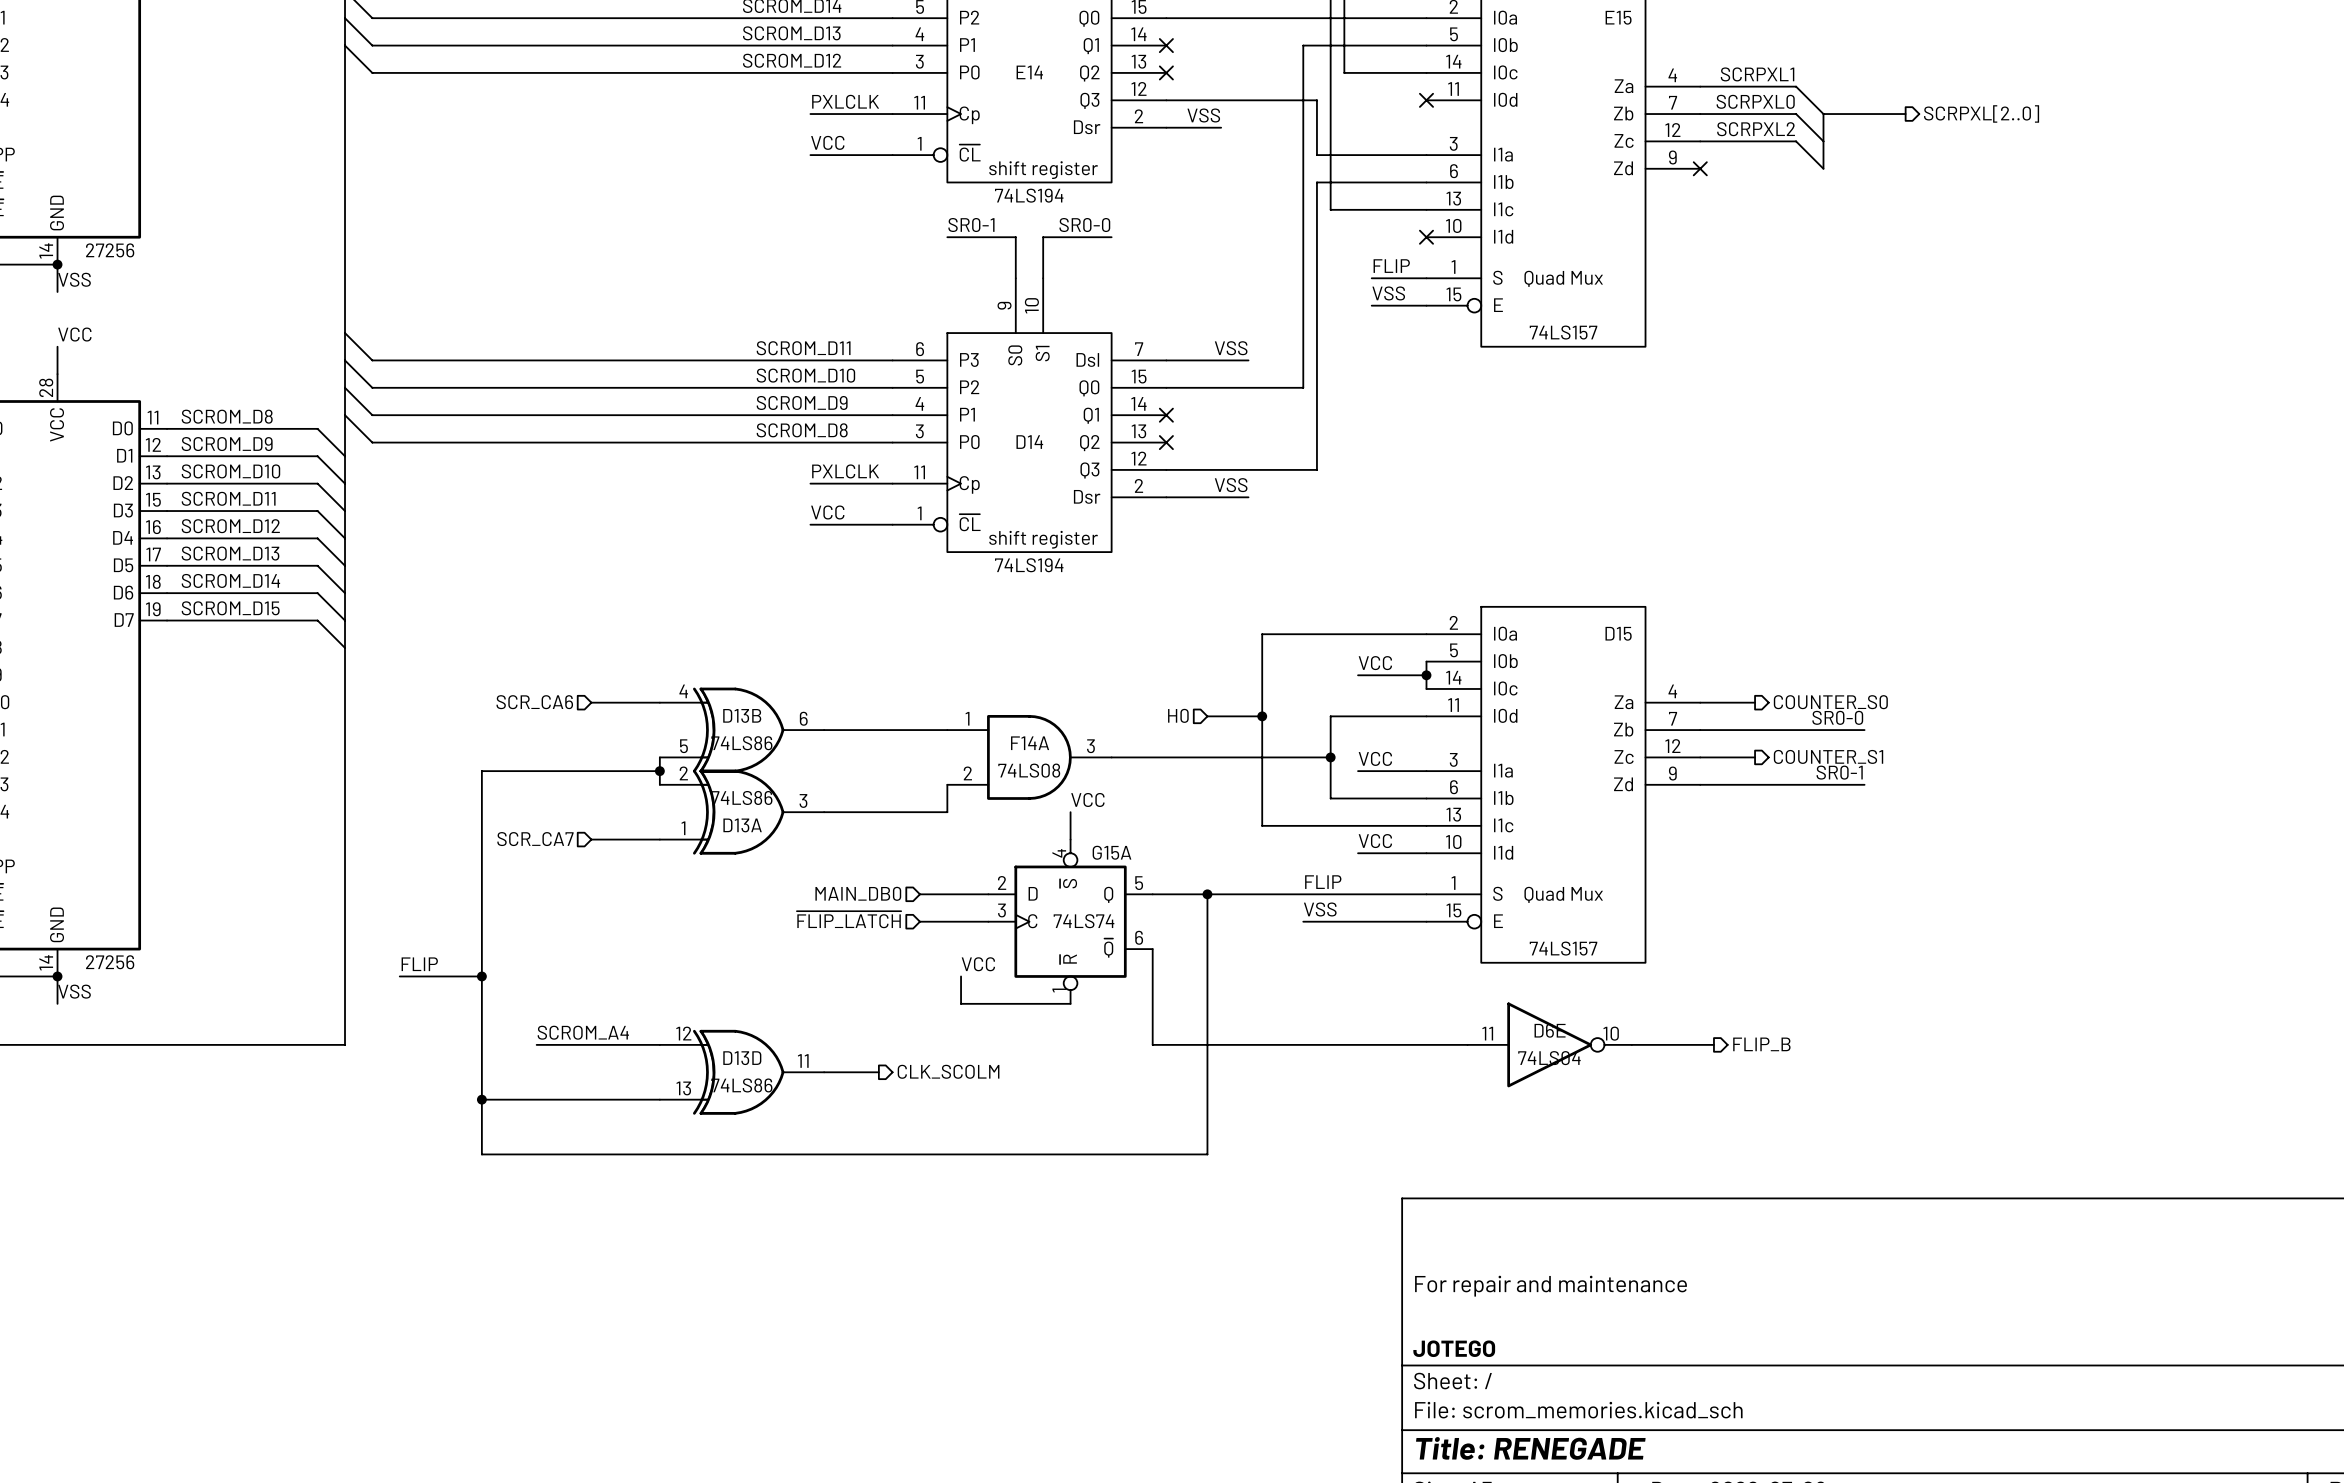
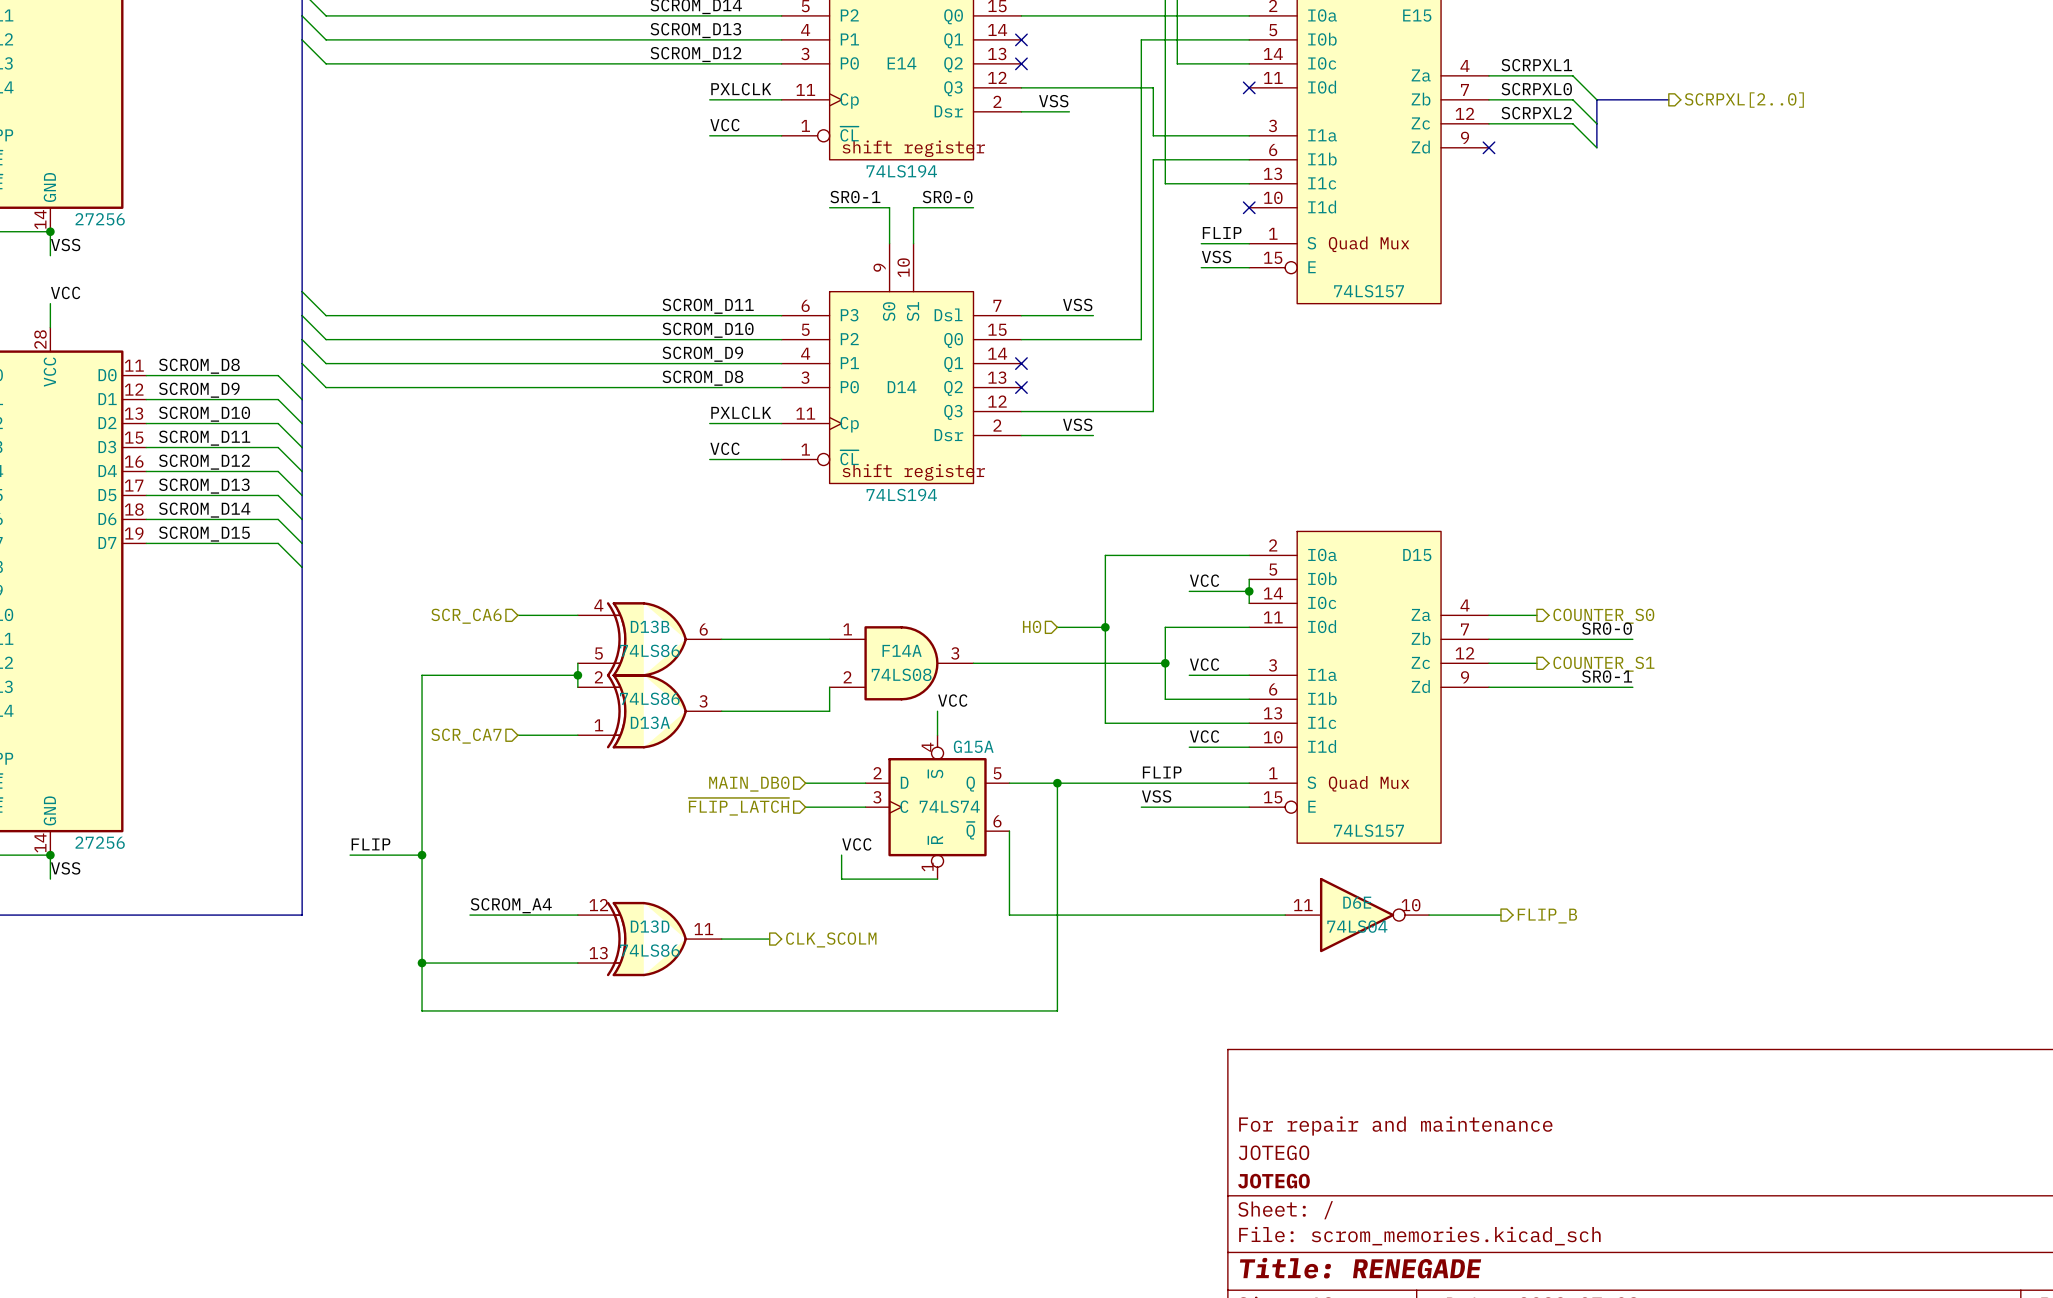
title block: none -> JOTEGO (1274, 1152)

